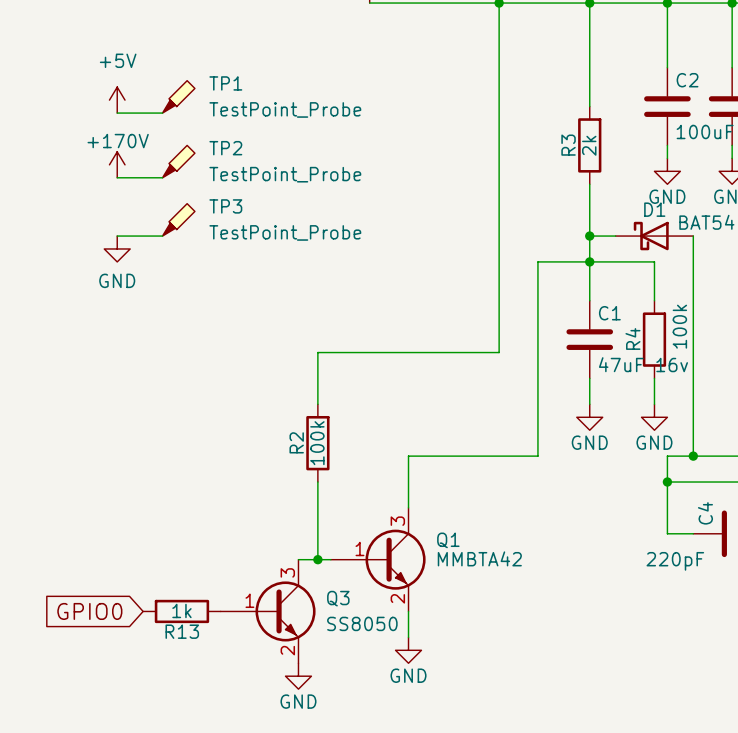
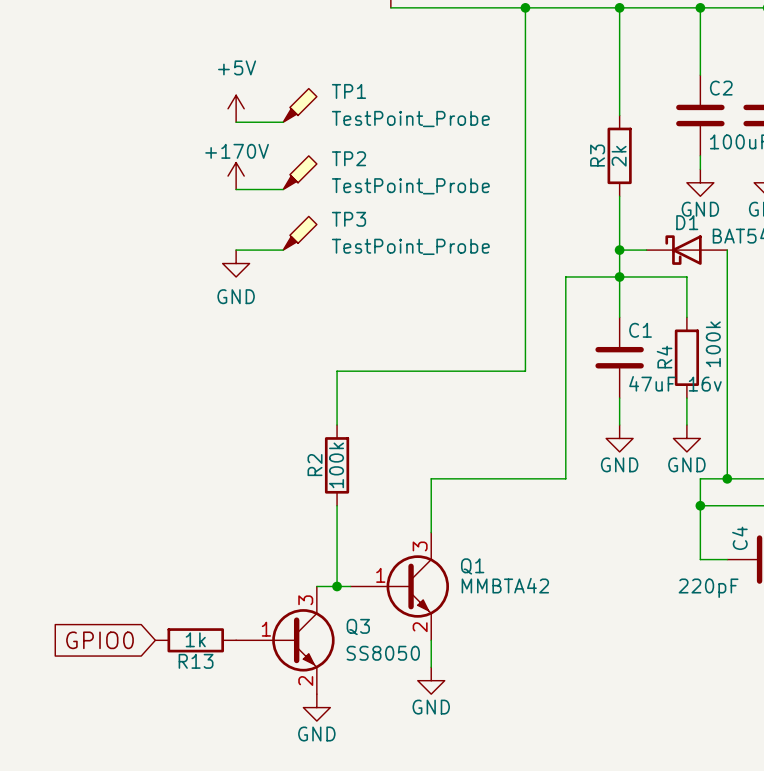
TP1 position: (178, 96) -> (300, 105)
power symbol position: +5V (117, 100) -> +5V (236, 108)
wire: (117, 113) (162, 113) -> (236, 122) (283, 122)
TP2 position: (178, 161) -> (300, 172)
power symbol position: +170V (117, 164) -> +170V (236, 176)
wire: (117, 177) (162, 177) -> (236, 189) (283, 189)
TP3 position: (178, 219) -> (300, 233)
wire: (117, 236) (162, 236) -> (236, 250) (283, 250)
power symbol position: GND (117, 248) -> GND (236, 263)

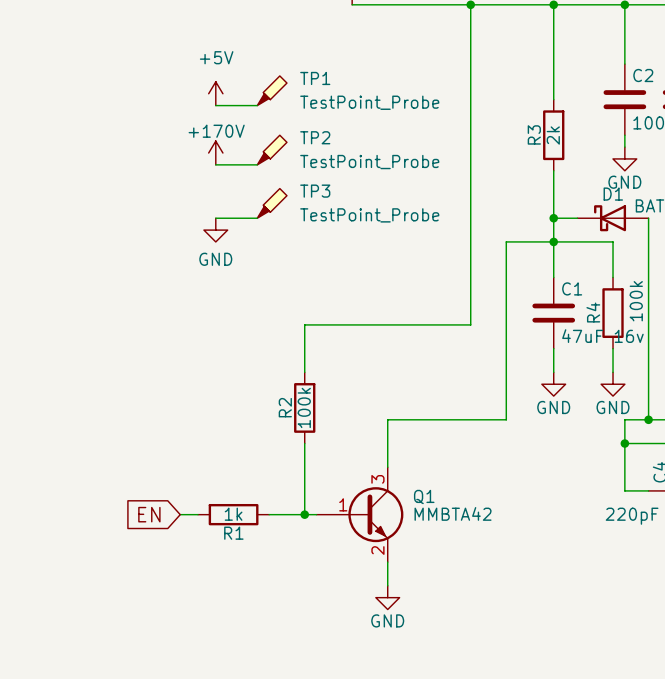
global label: none -> EN (149, 514)
wire: none -> (180, 514) (198, 514)
R1: none -> 1k (233, 514)
wire: none -> (269, 514) (286, 514)
global label: GPIO0 (100, 640) -> none
R13: 1k (195, 640) -> none
Q3: SS8050 (285, 640) -> none
power symbol: GND (316, 707) -> none

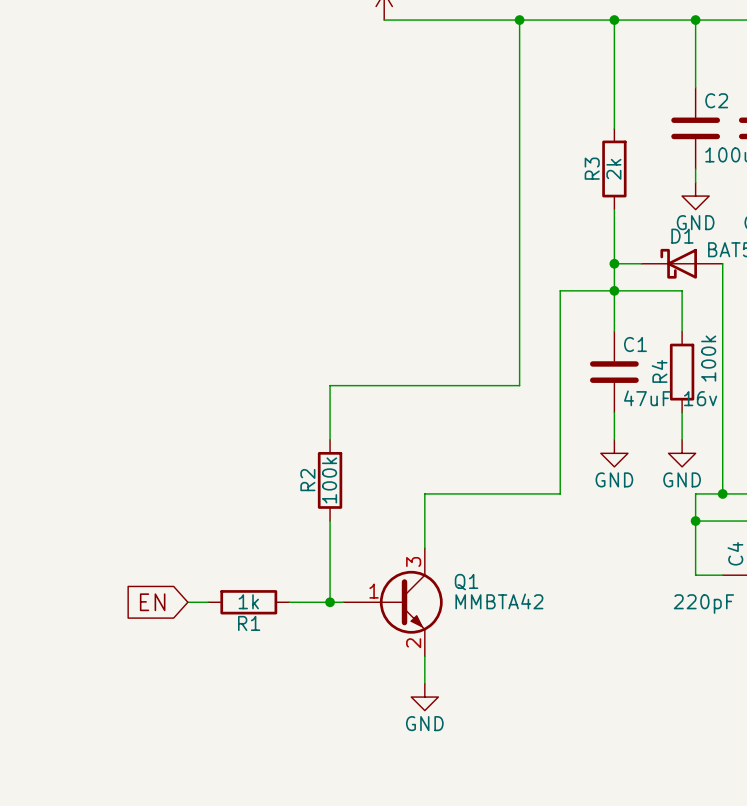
TP1: TestPoint_Probe (272, 90) -> none
power symbol: +5V (215, 93) -> none
wire: (215, 105) (257, 105) -> none
TP2: TestPoint_Probe (272, 150) -> none
power symbol: +170V (215, 153) -> none
wire: (215, 164) (257, 164) -> none
TP3: TestPoint_Probe (272, 203) -> none
wire: (215, 218) (257, 218) -> none
power symbol: GND (215, 230) -> none

